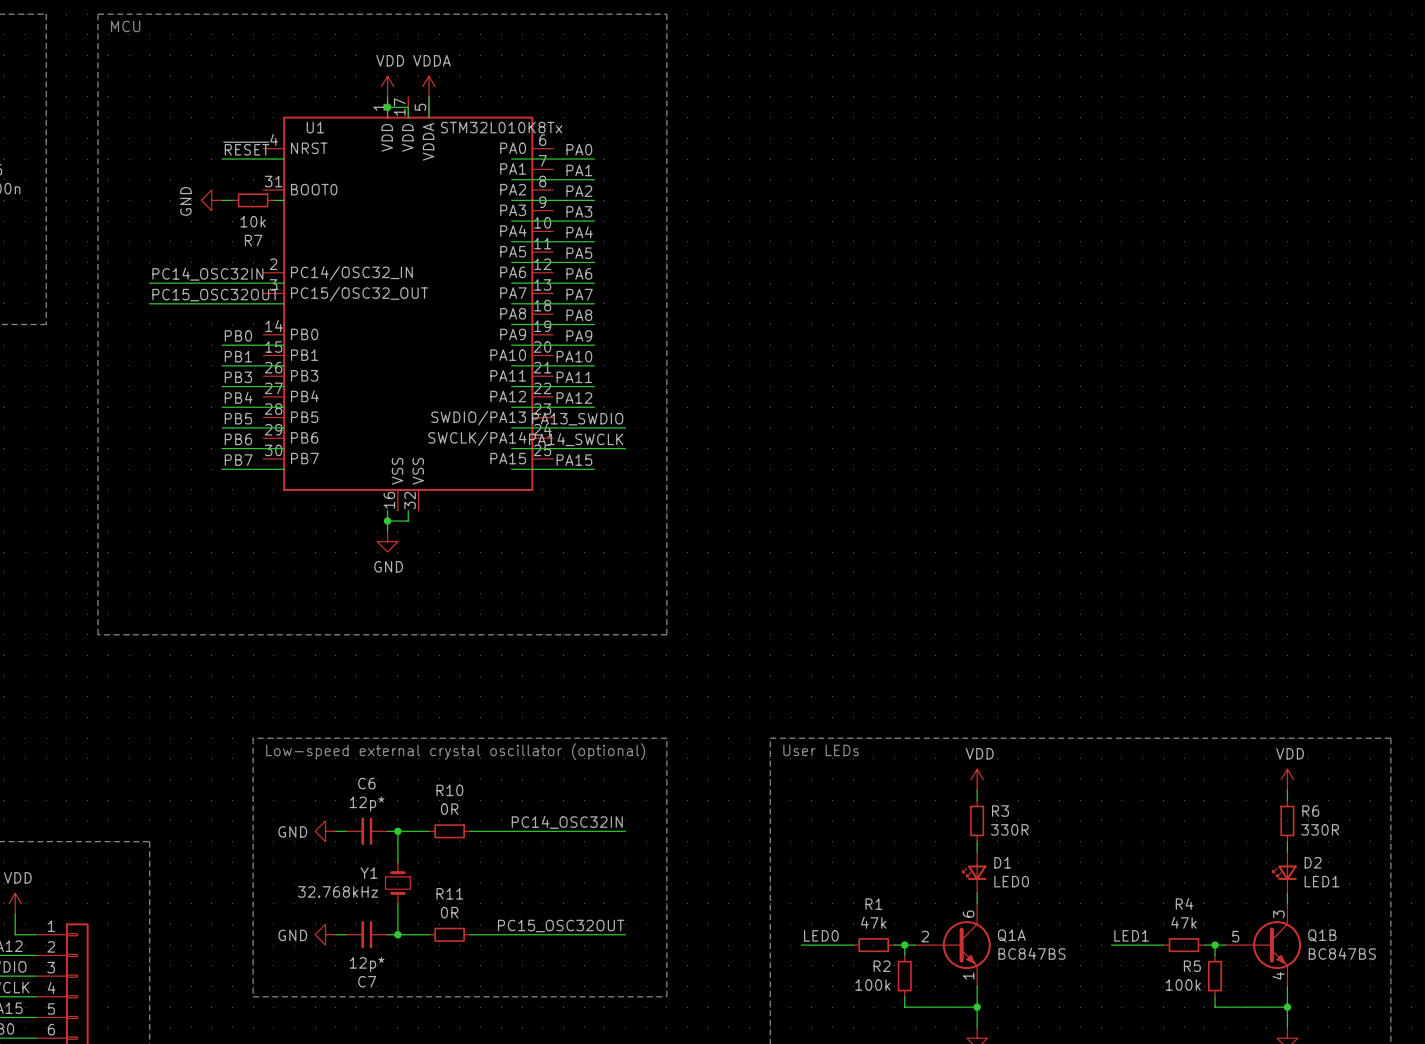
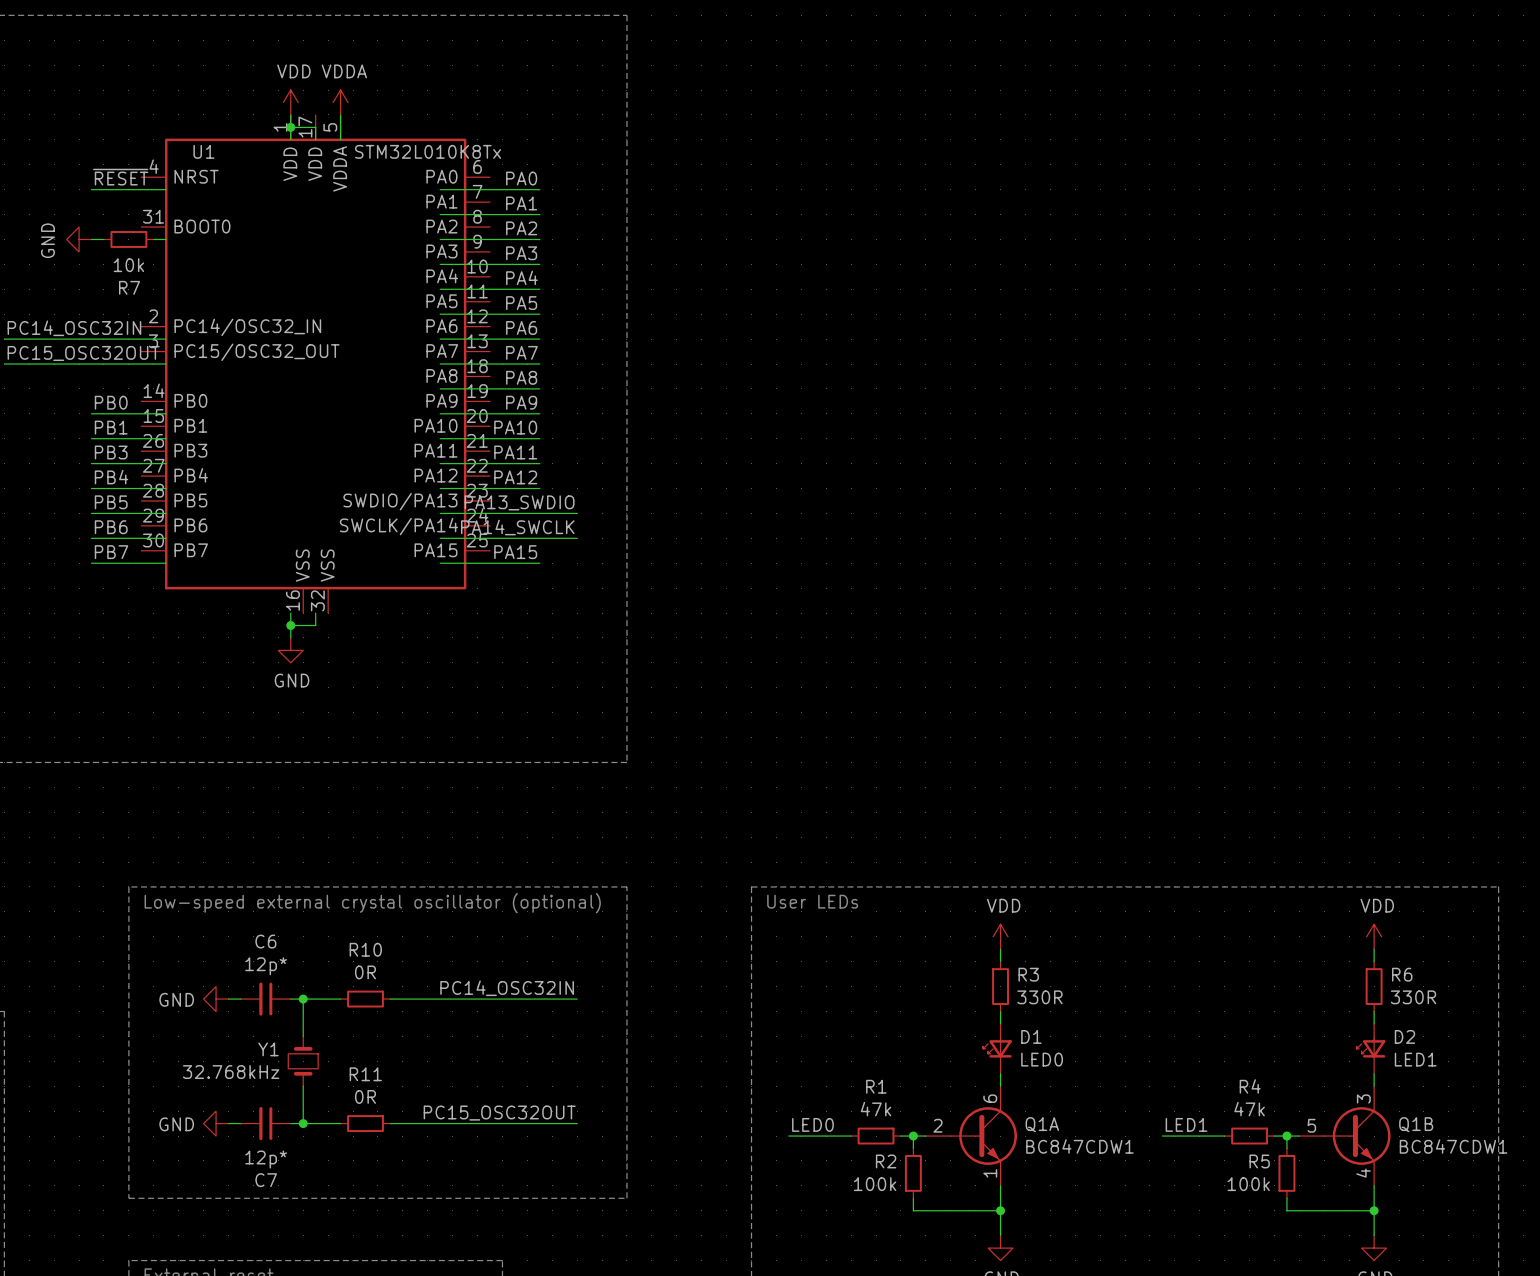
Q1A value: BC847BS (1032, 953) -> BC847CDW1 (1079, 1146)
Q1B value: BC847BS (1342, 953) -> BC847CDW1 (1453, 1146)

